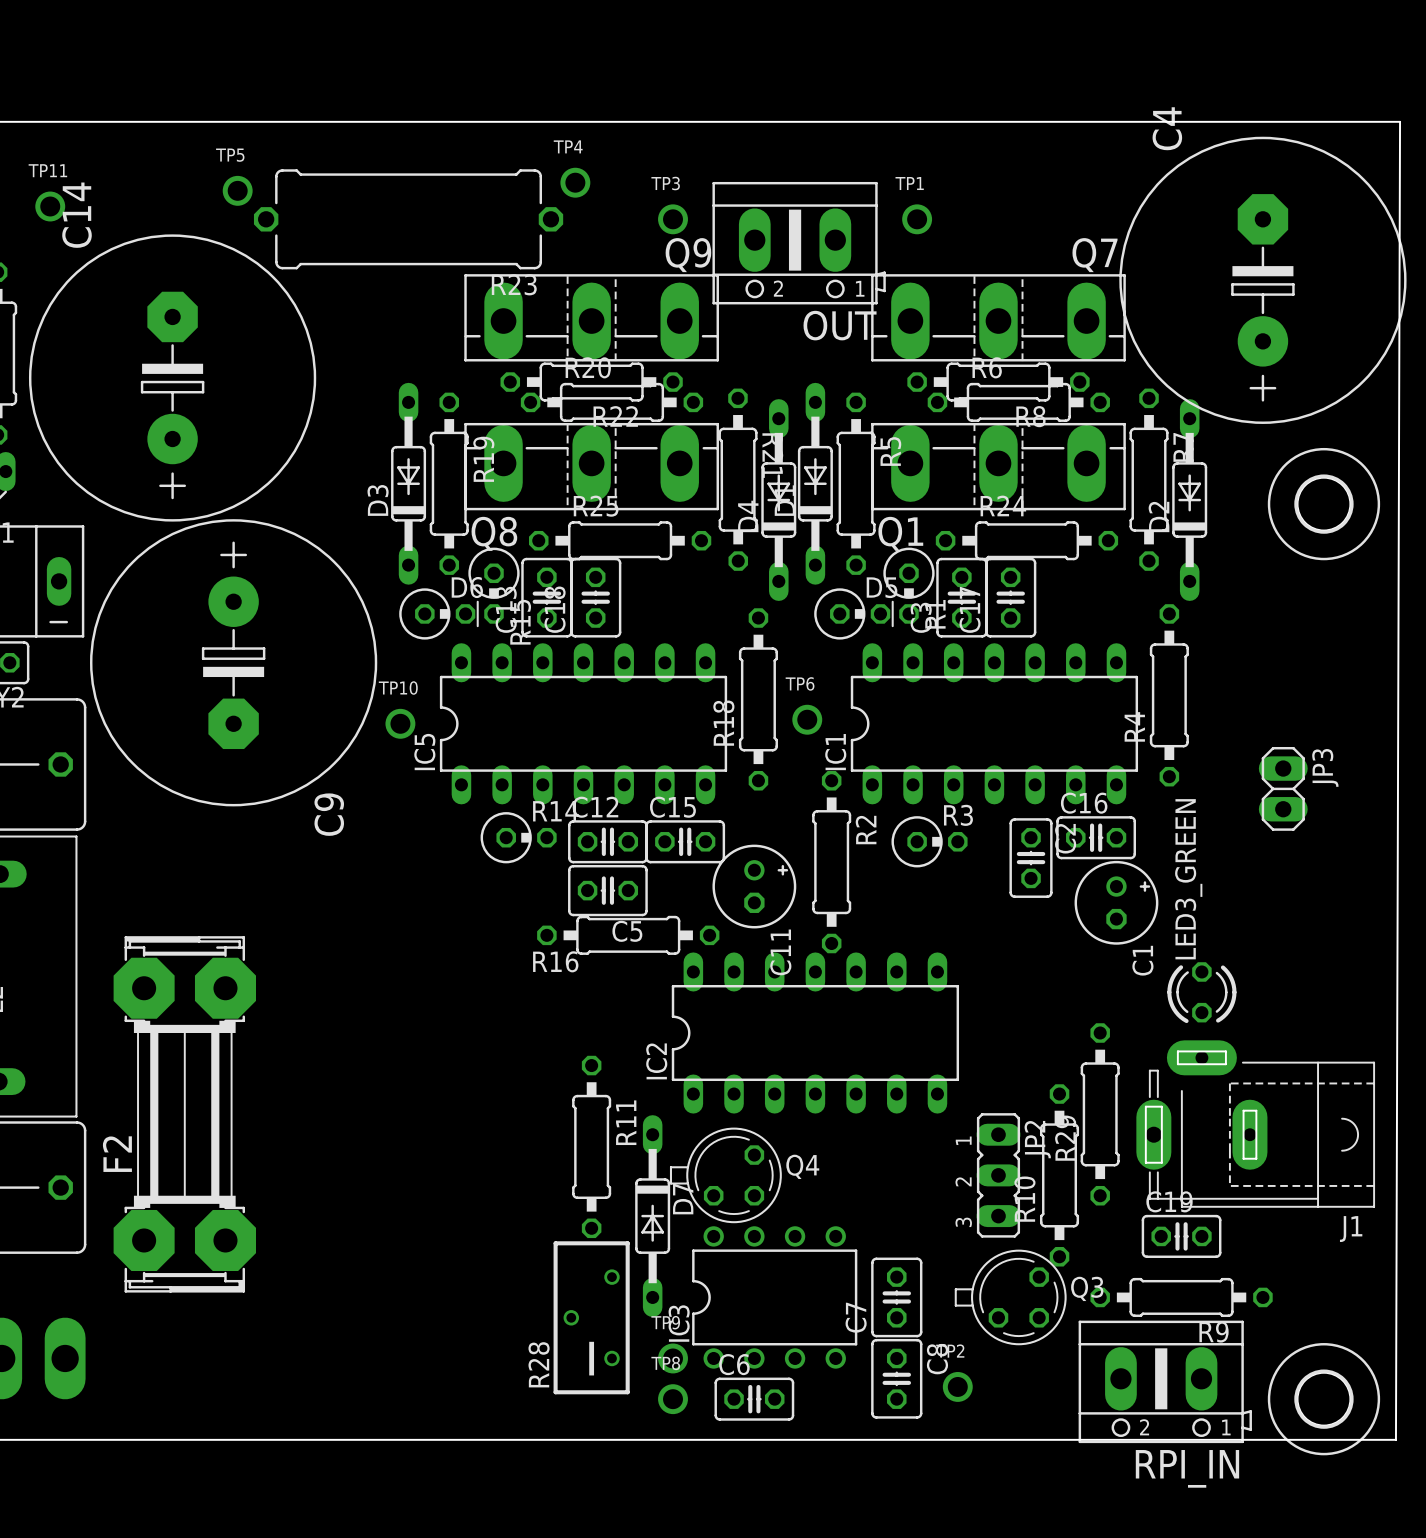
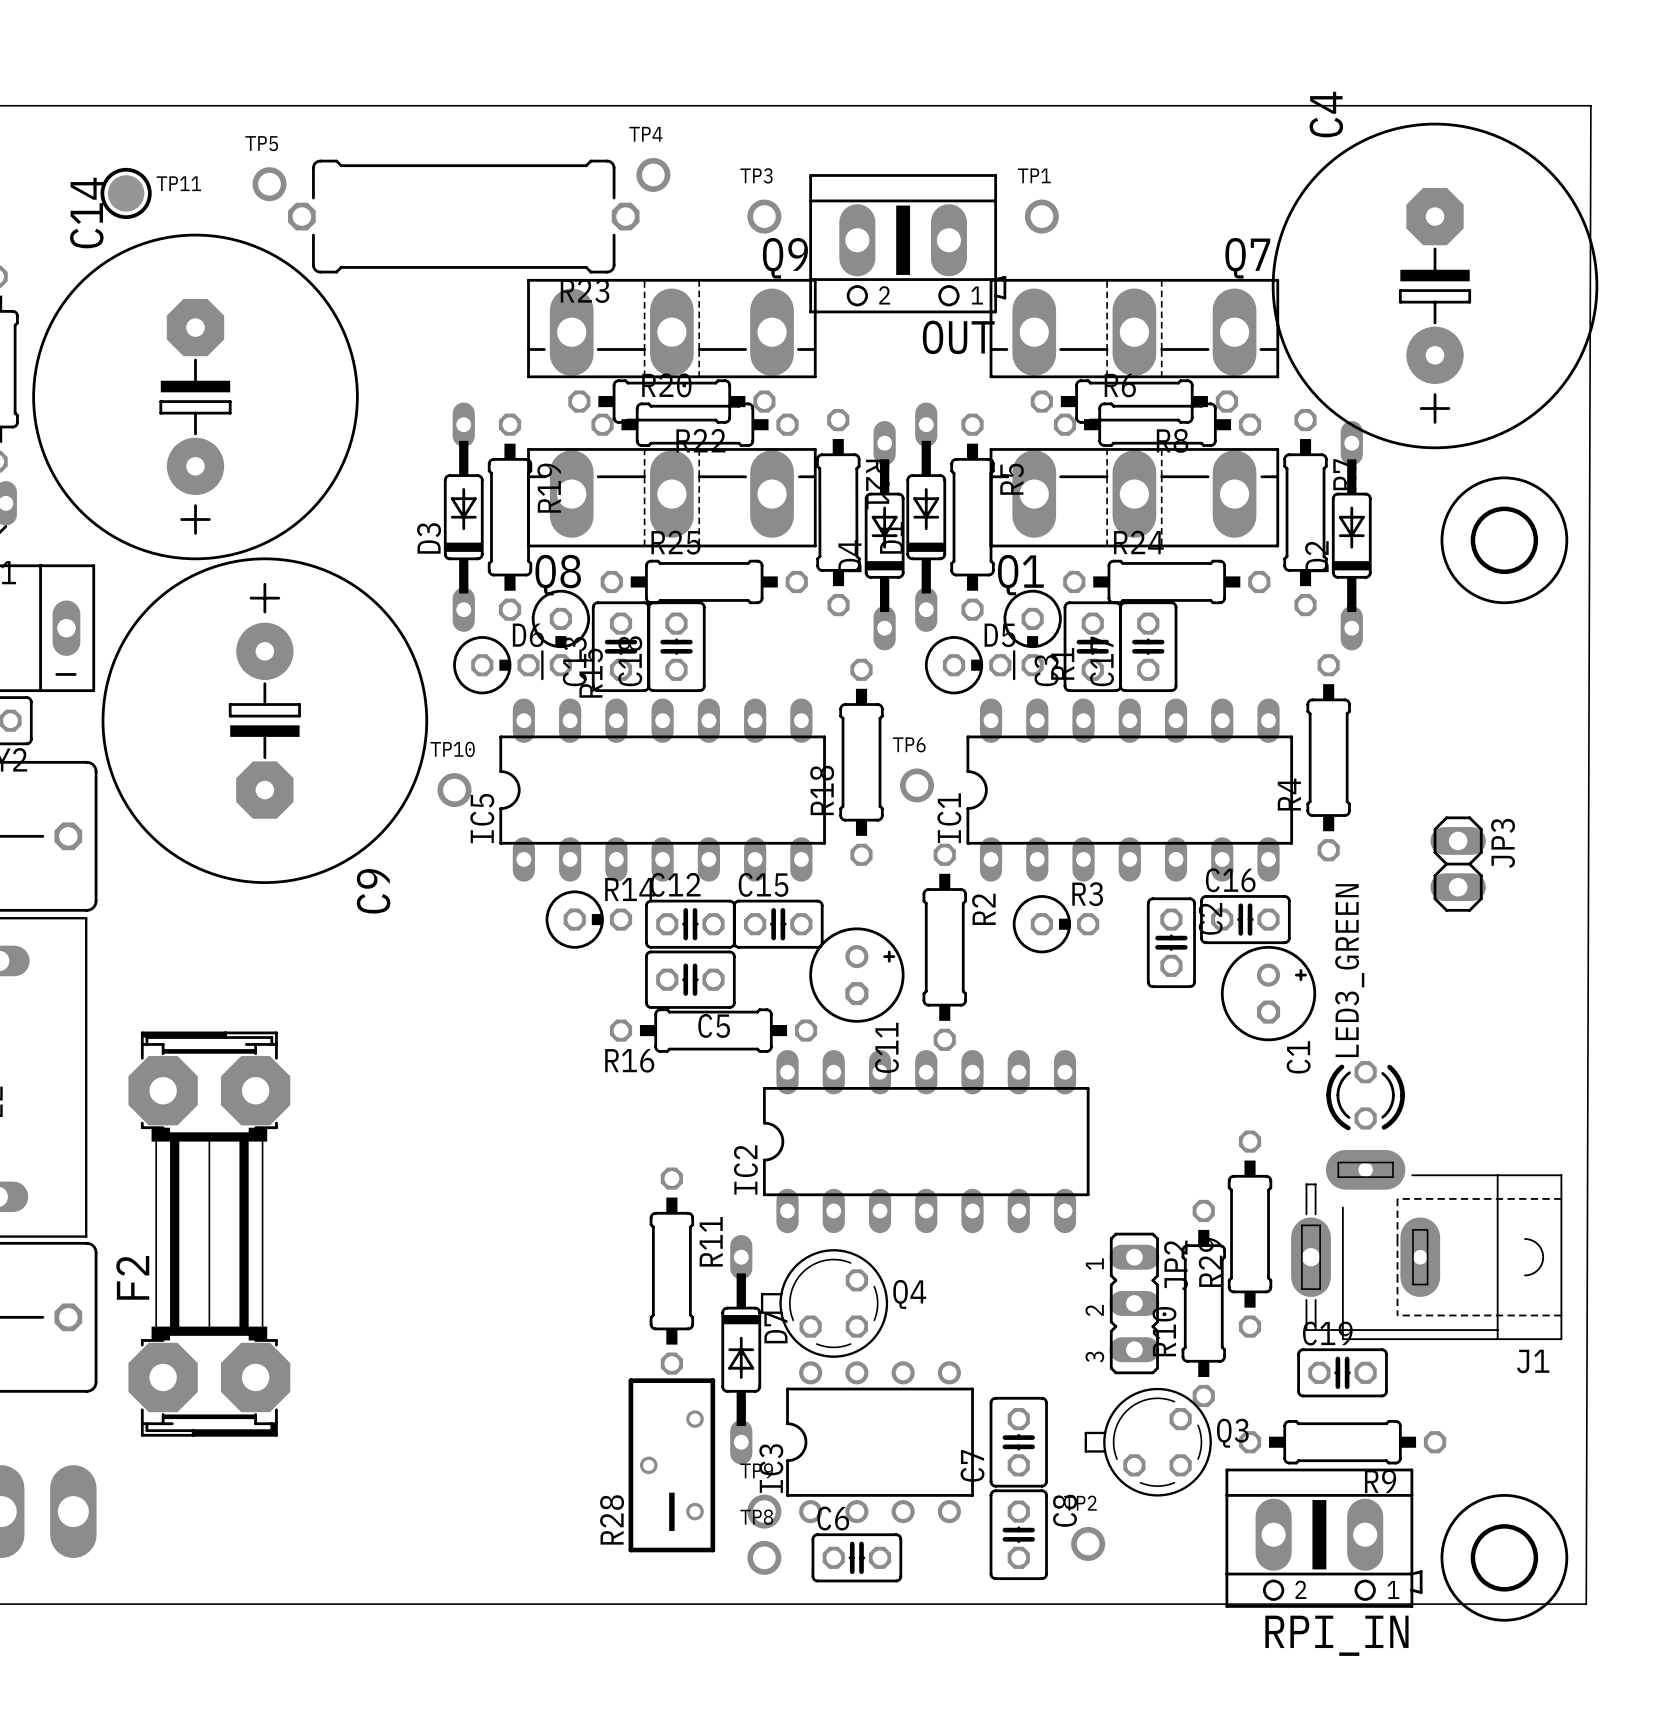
TP11 name position: TP11 (47, 170) -> TP11 (178, 183)
TP11 footprint: [35, 191, 66, 222] -> [100, 167, 152, 220]

